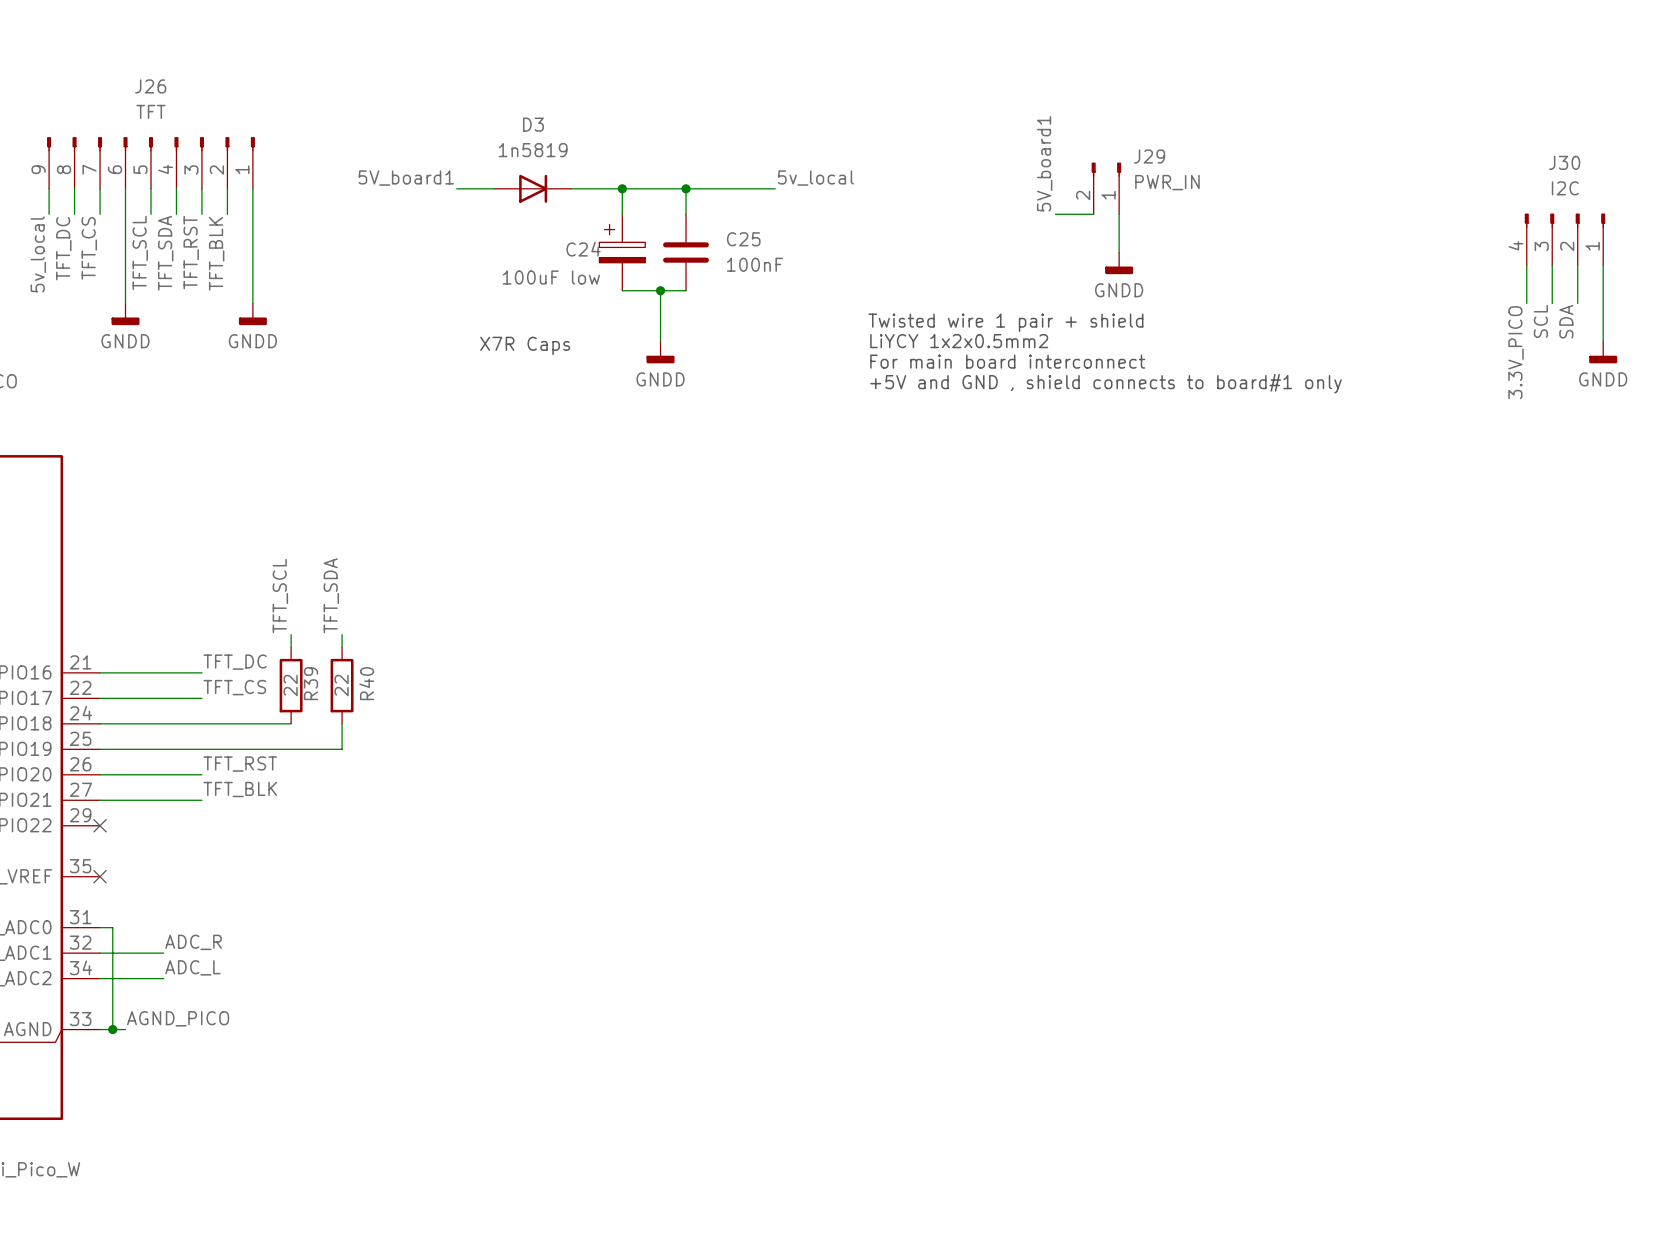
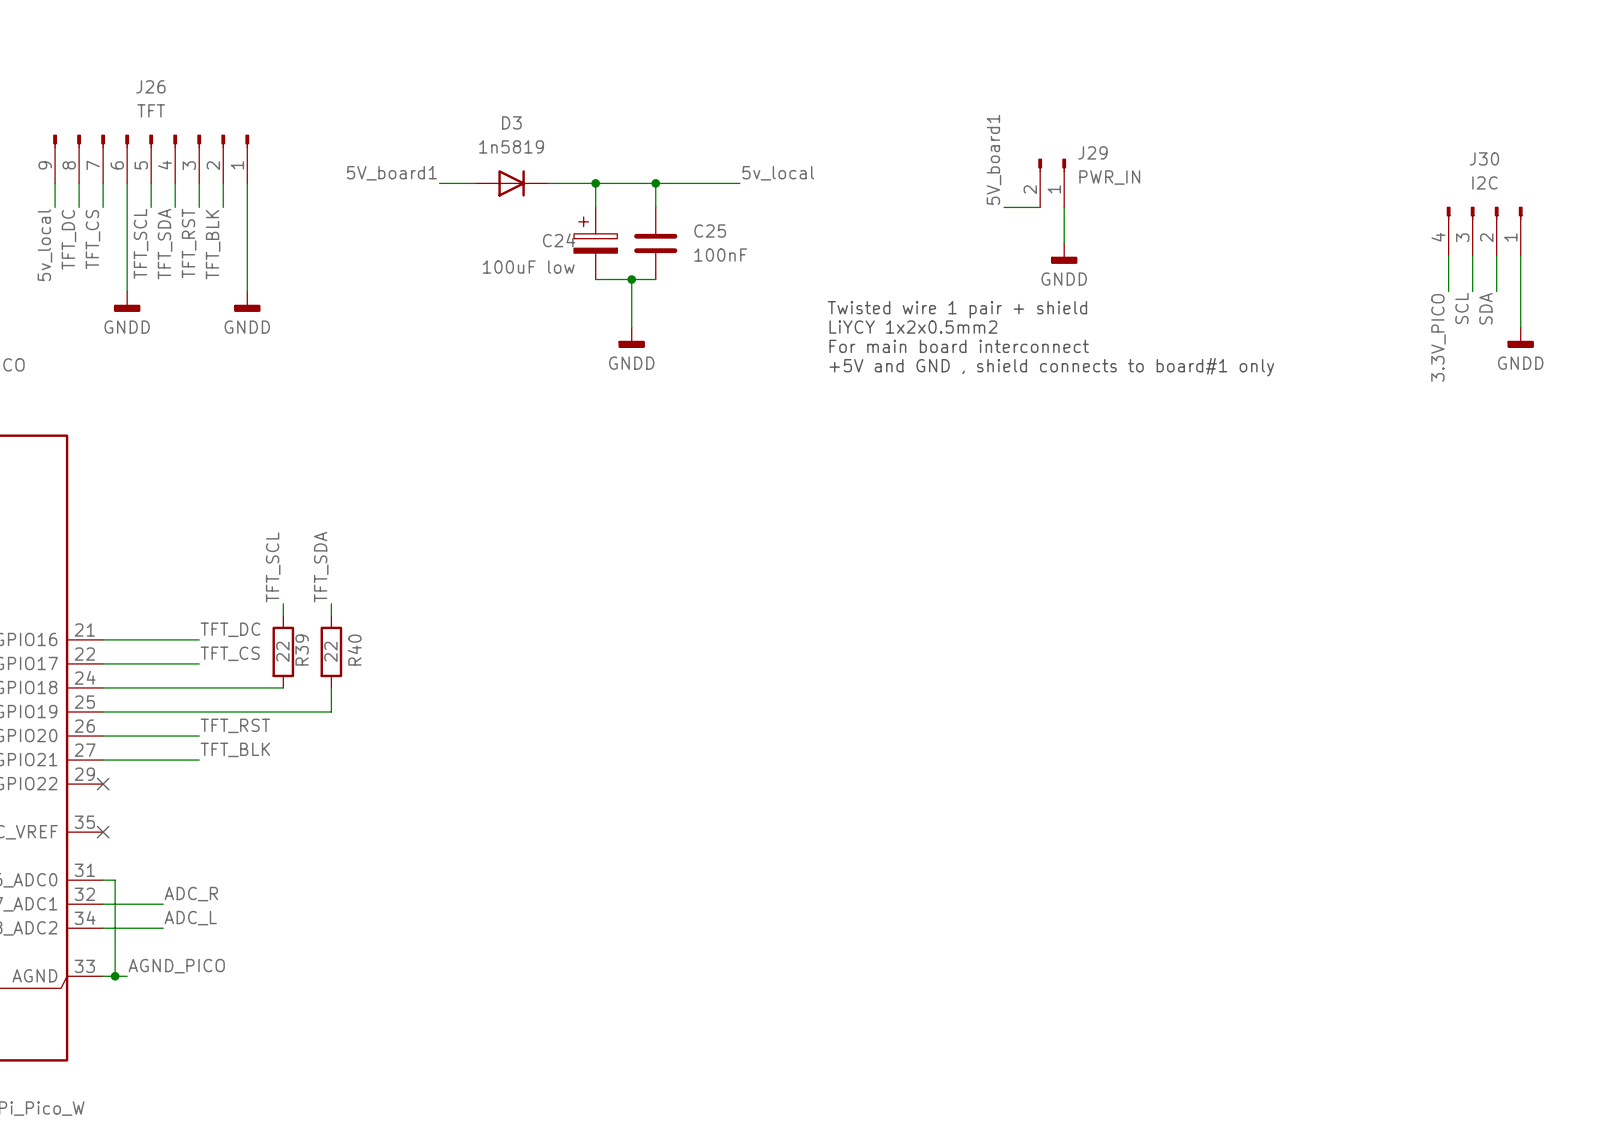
text: X7R Caps (525, 345) -> none

